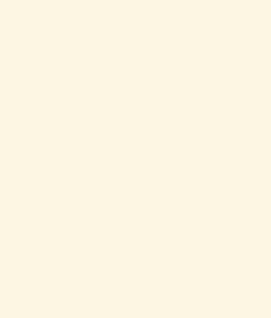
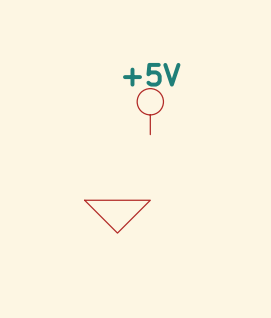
power symbol: none -> +5V (150, 111)
power symbol: none -> (117, 216)

